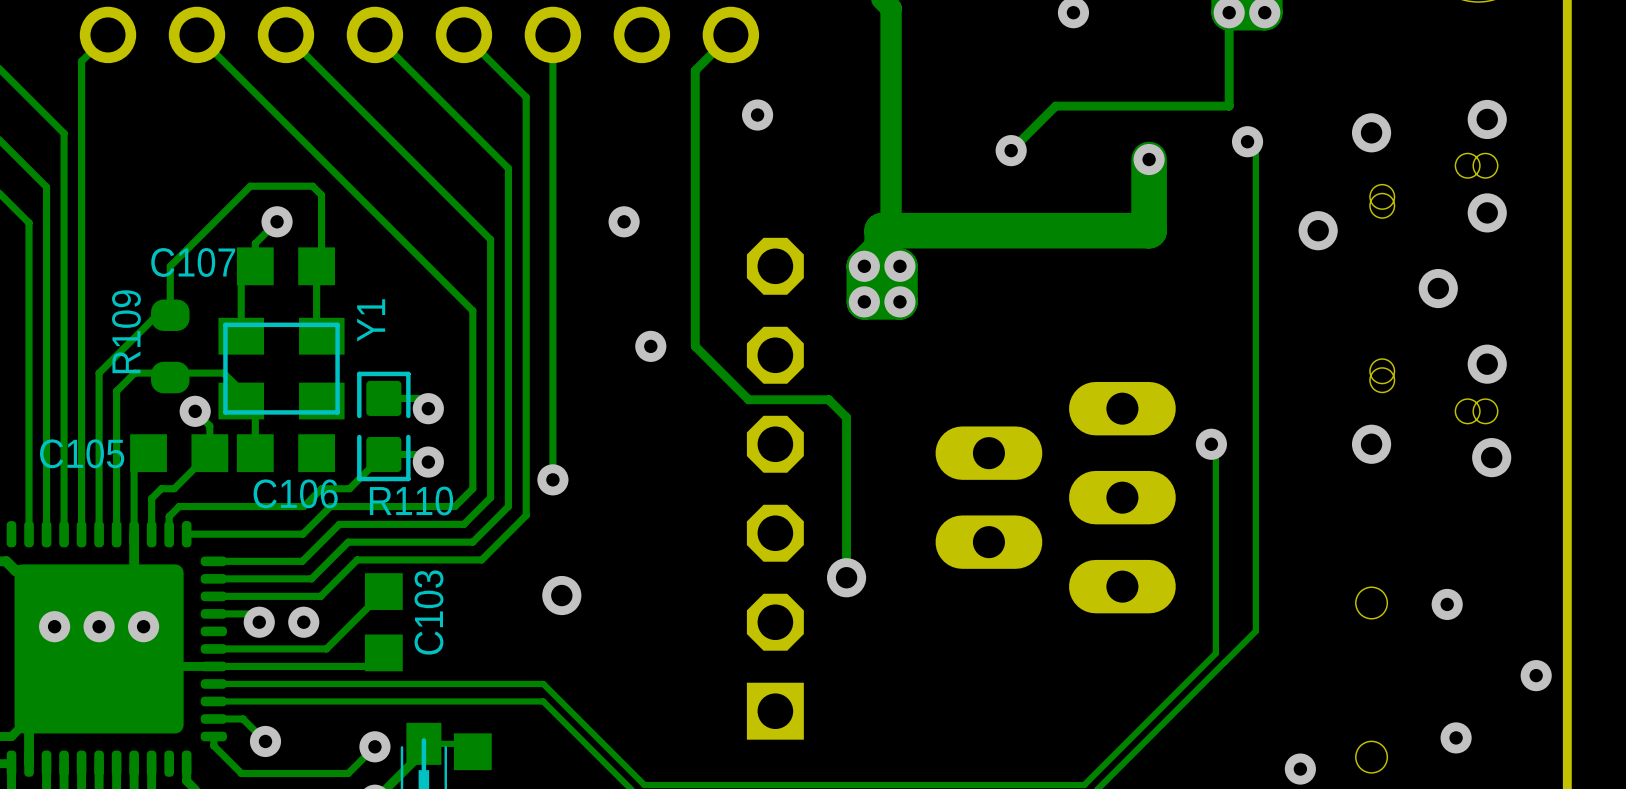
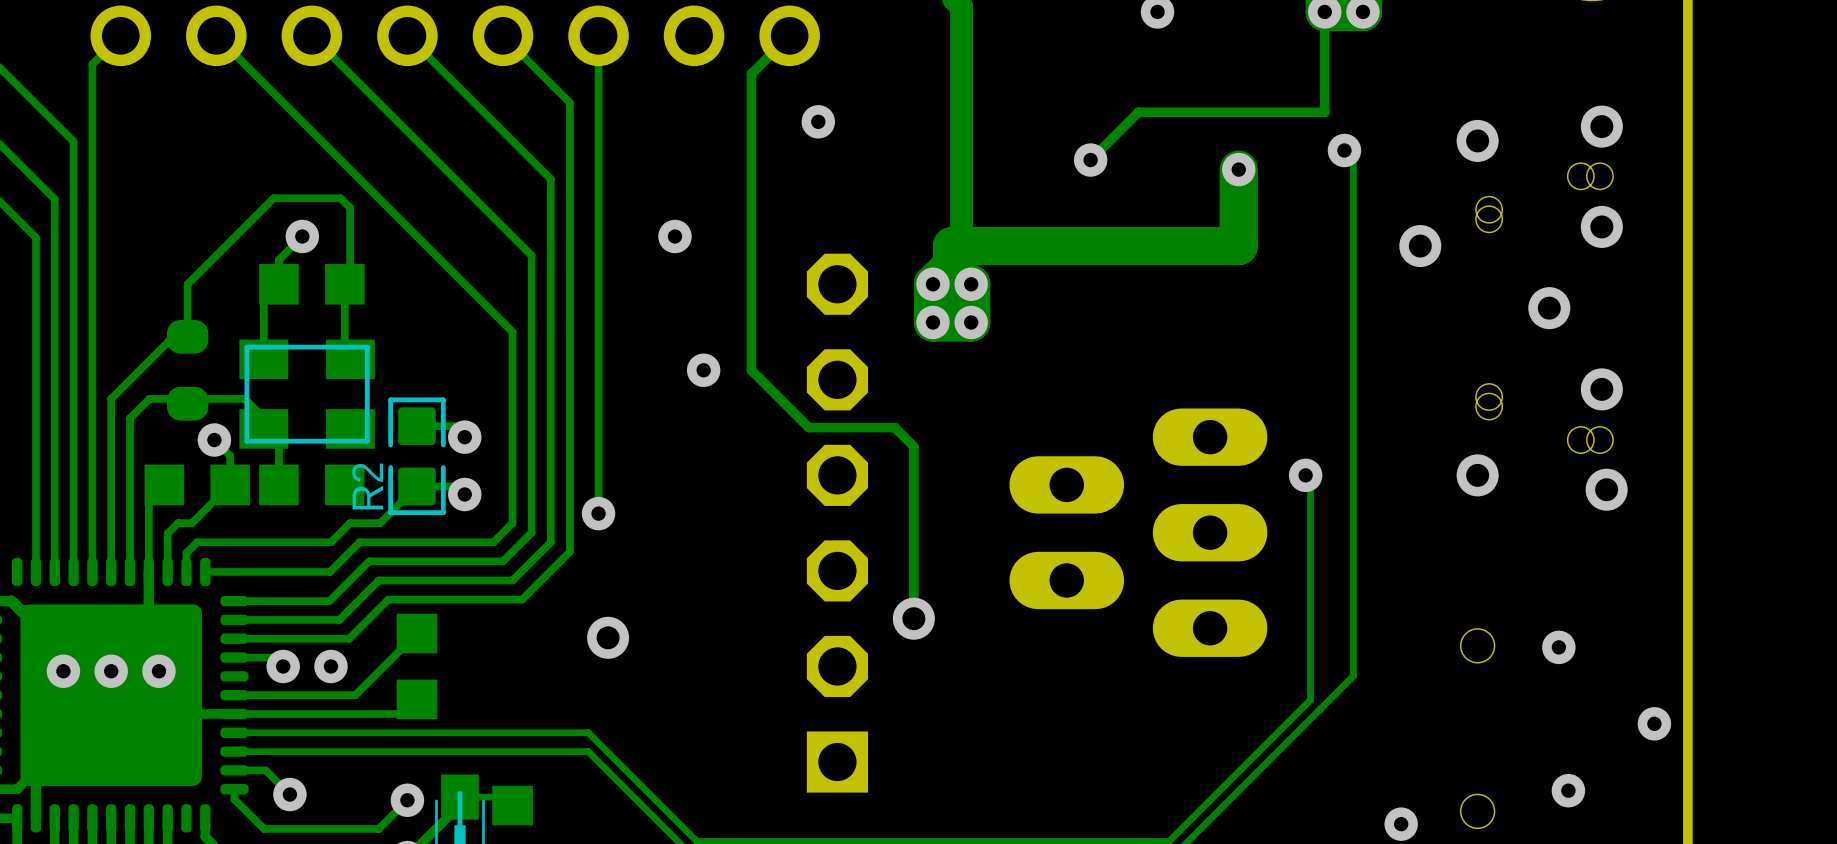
C107 name: C107 (193, 262) -> none
Y1 name: Y1 (371, 320) -> none
R109 name: R109 (126, 331) -> none
C105 name: C105 (82, 453) -> none
C106 name: C106 (295, 493) -> none
R110 name: R110 (411, 501) -> R2 (367, 486)
C103 name: C103 (428, 612) -> none

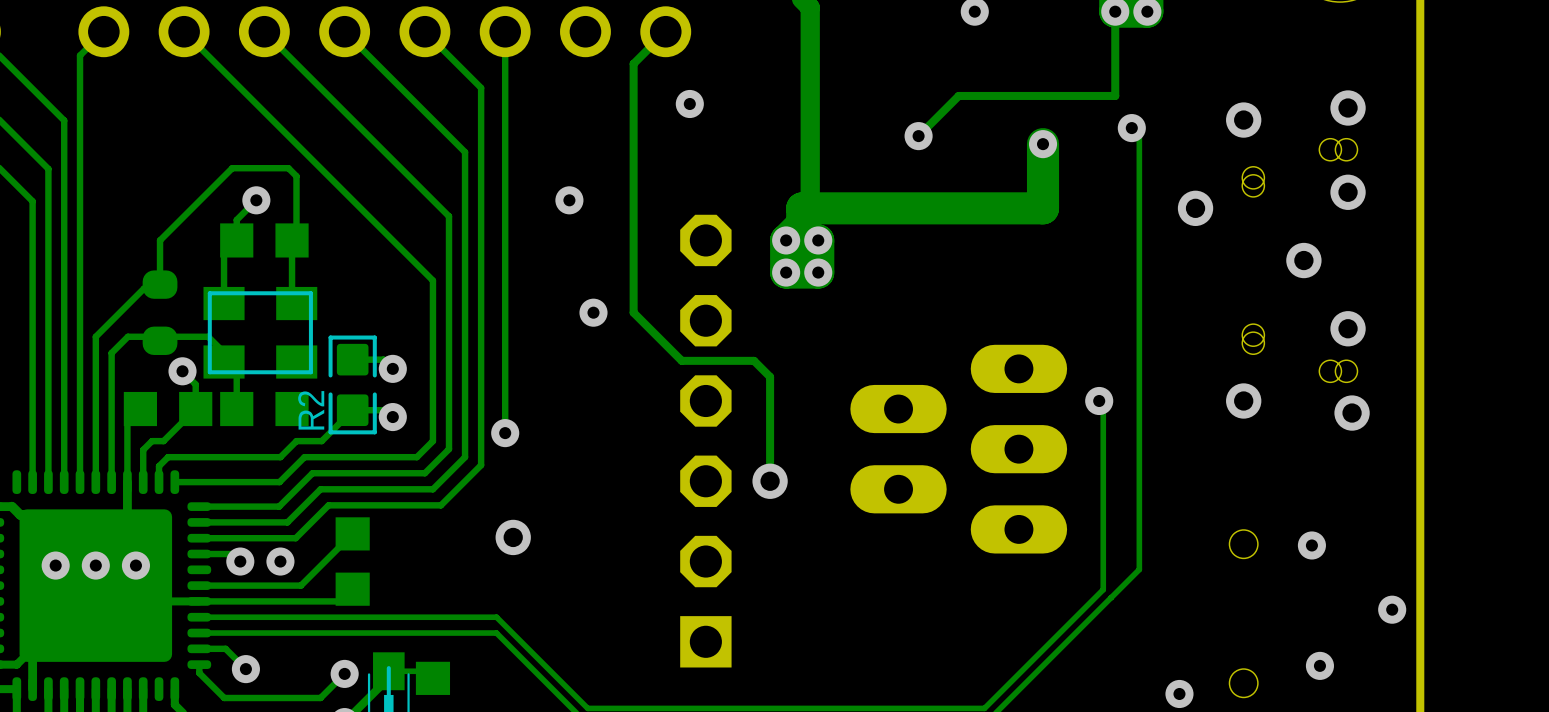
track: (913, 570) (913, 618) -> none
via position: (913, 618) -> (770, 481)

